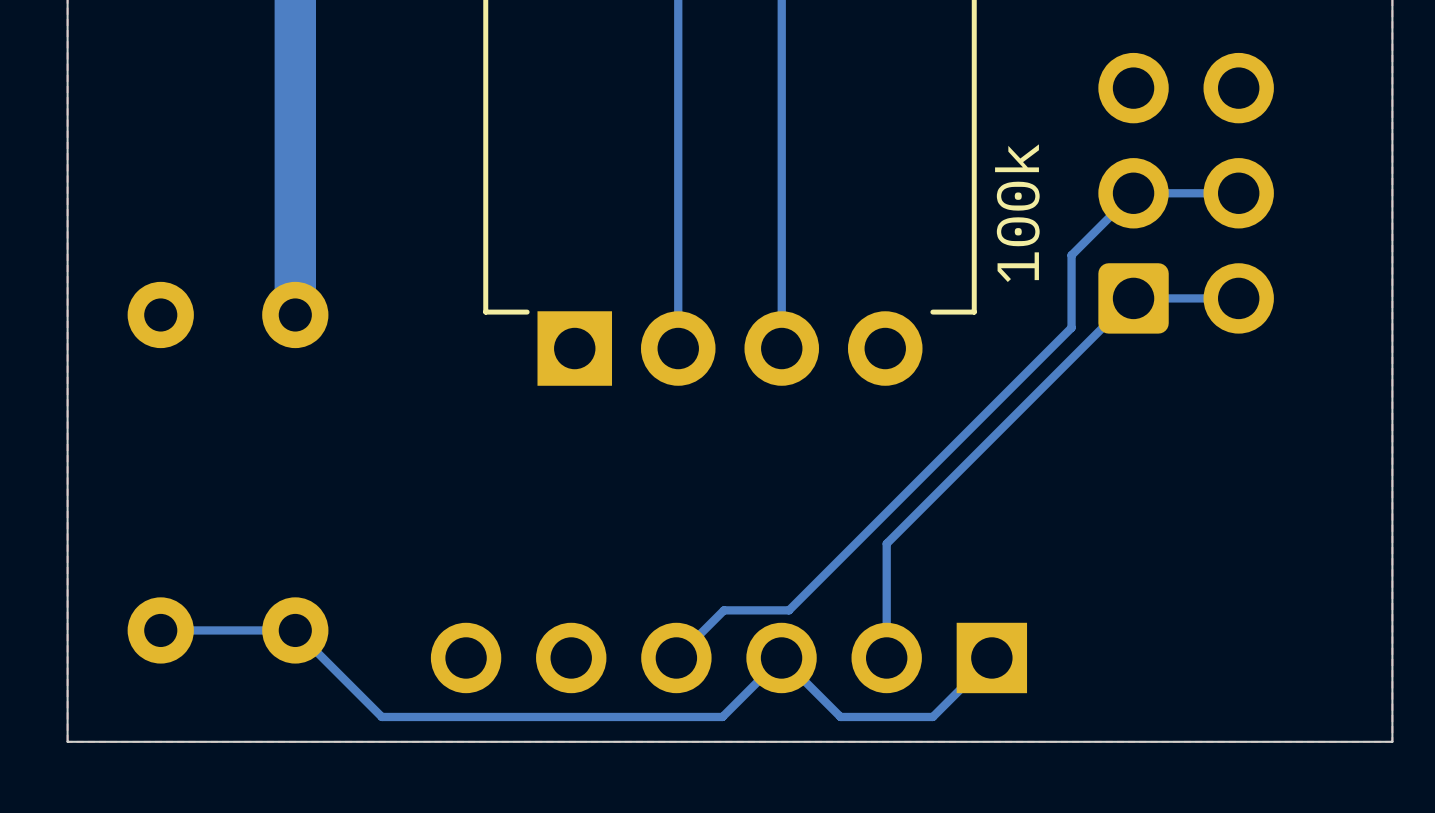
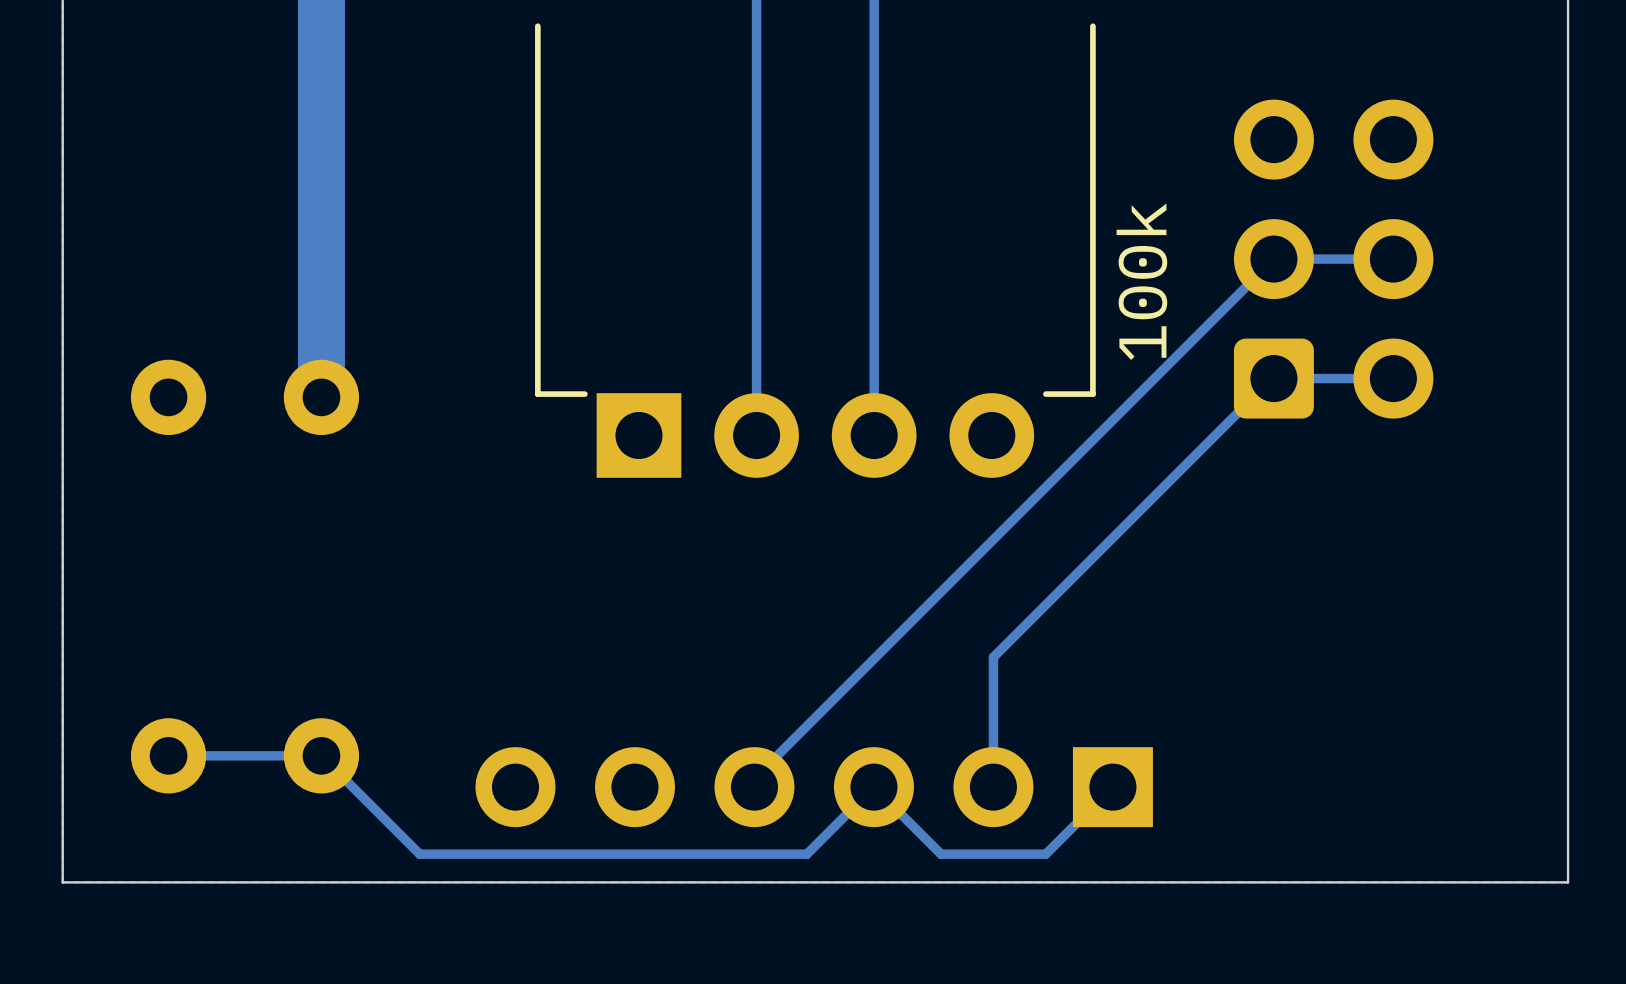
bottom track: (1071, 255) (1071, 327) (789, 610) (724, 610) (676, 657) -> (1203, 329) (754, 778) (754, 787)

